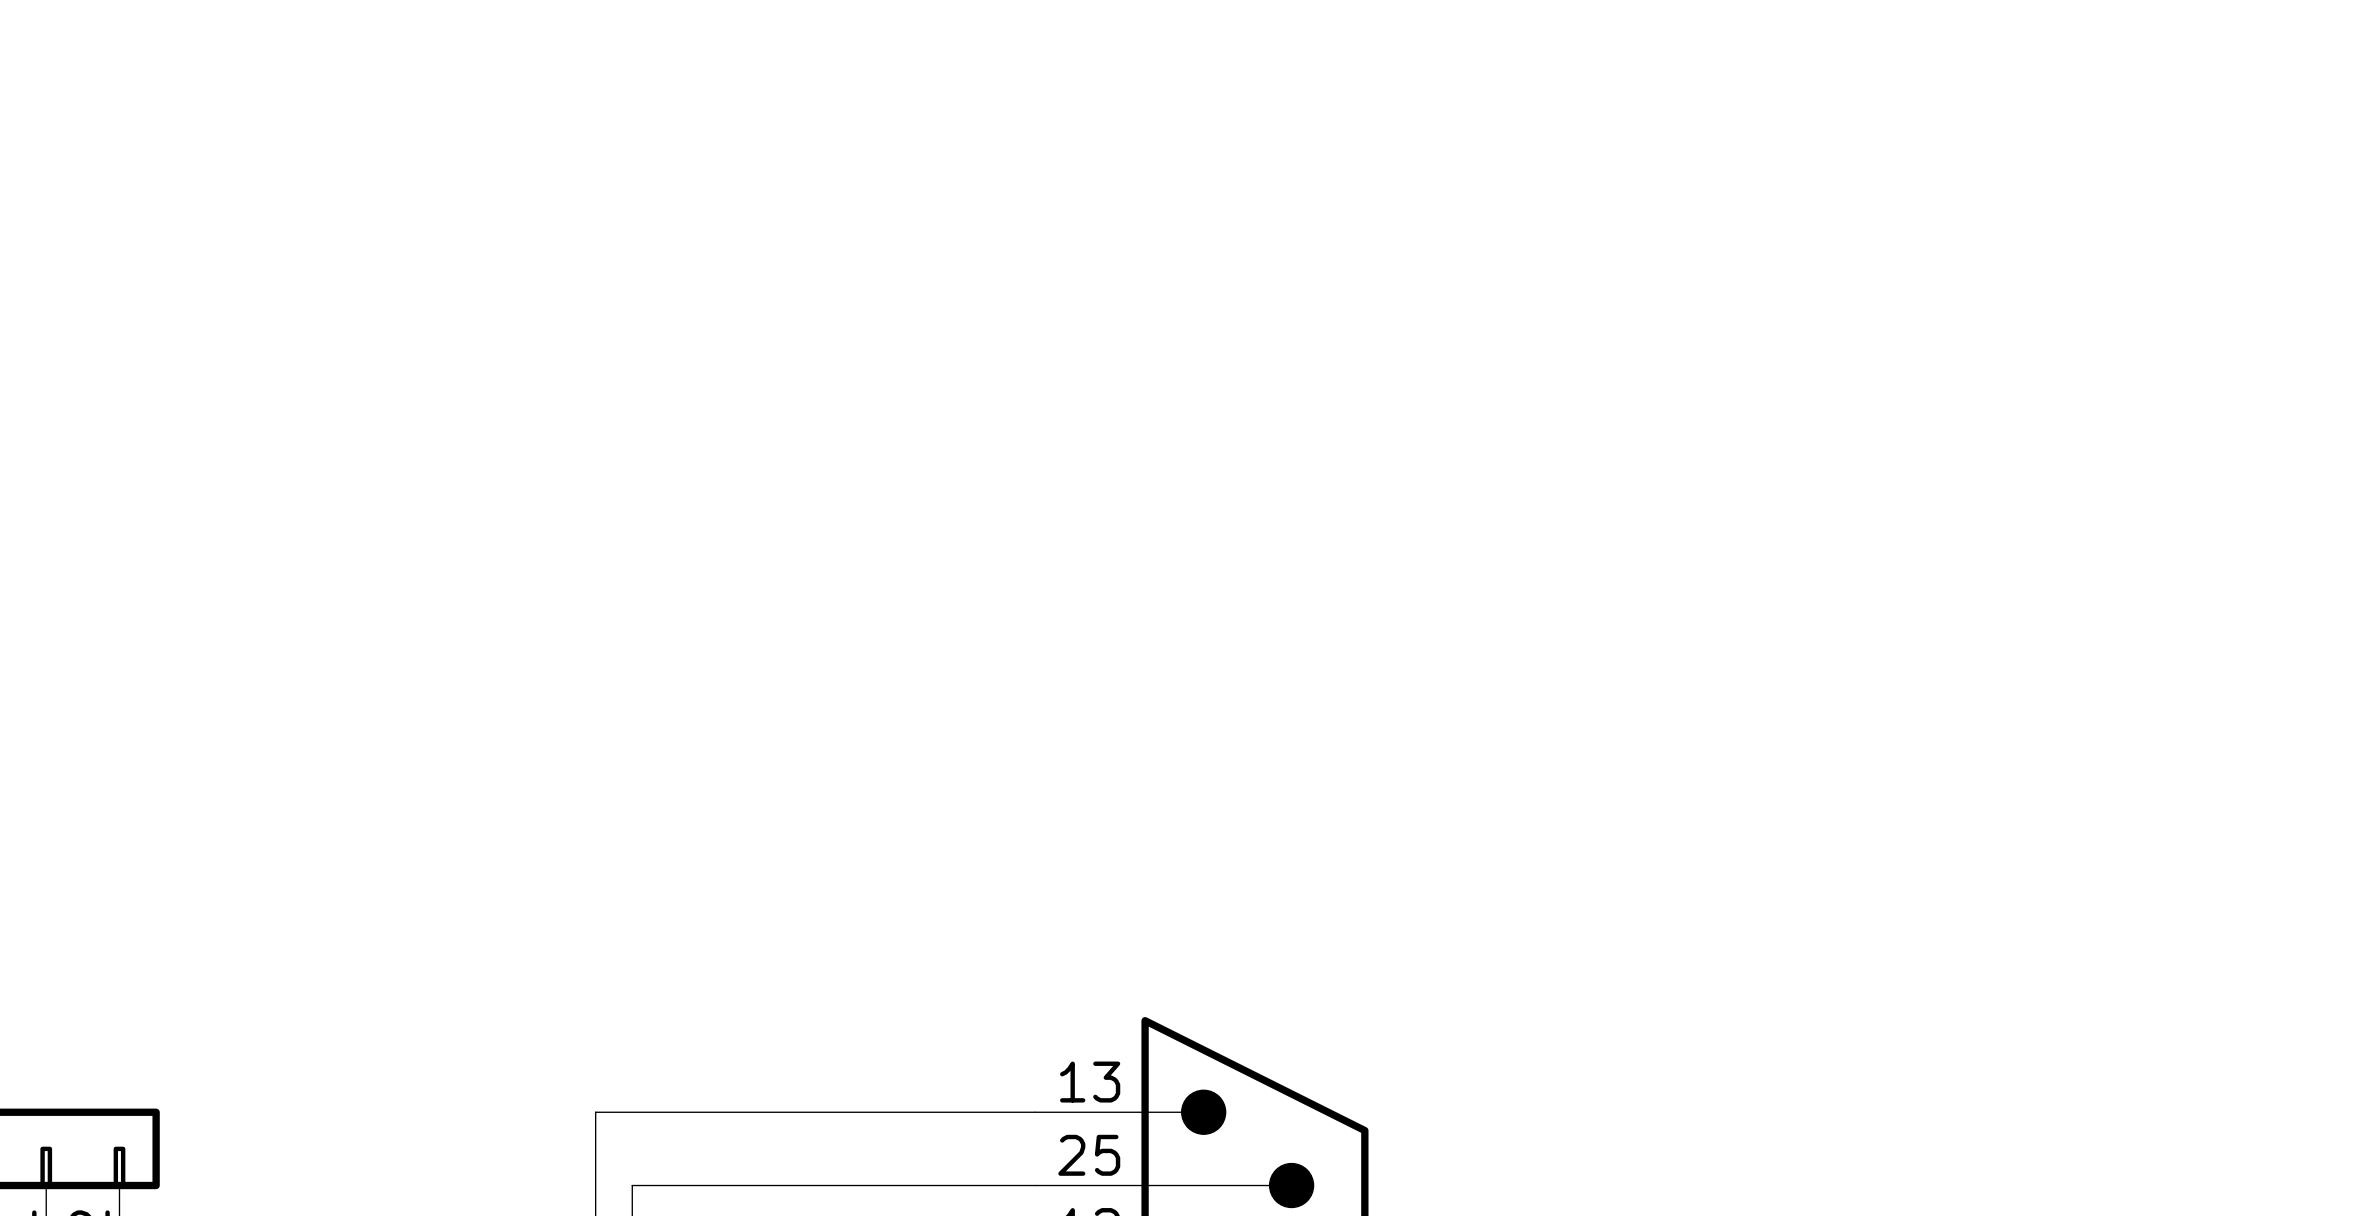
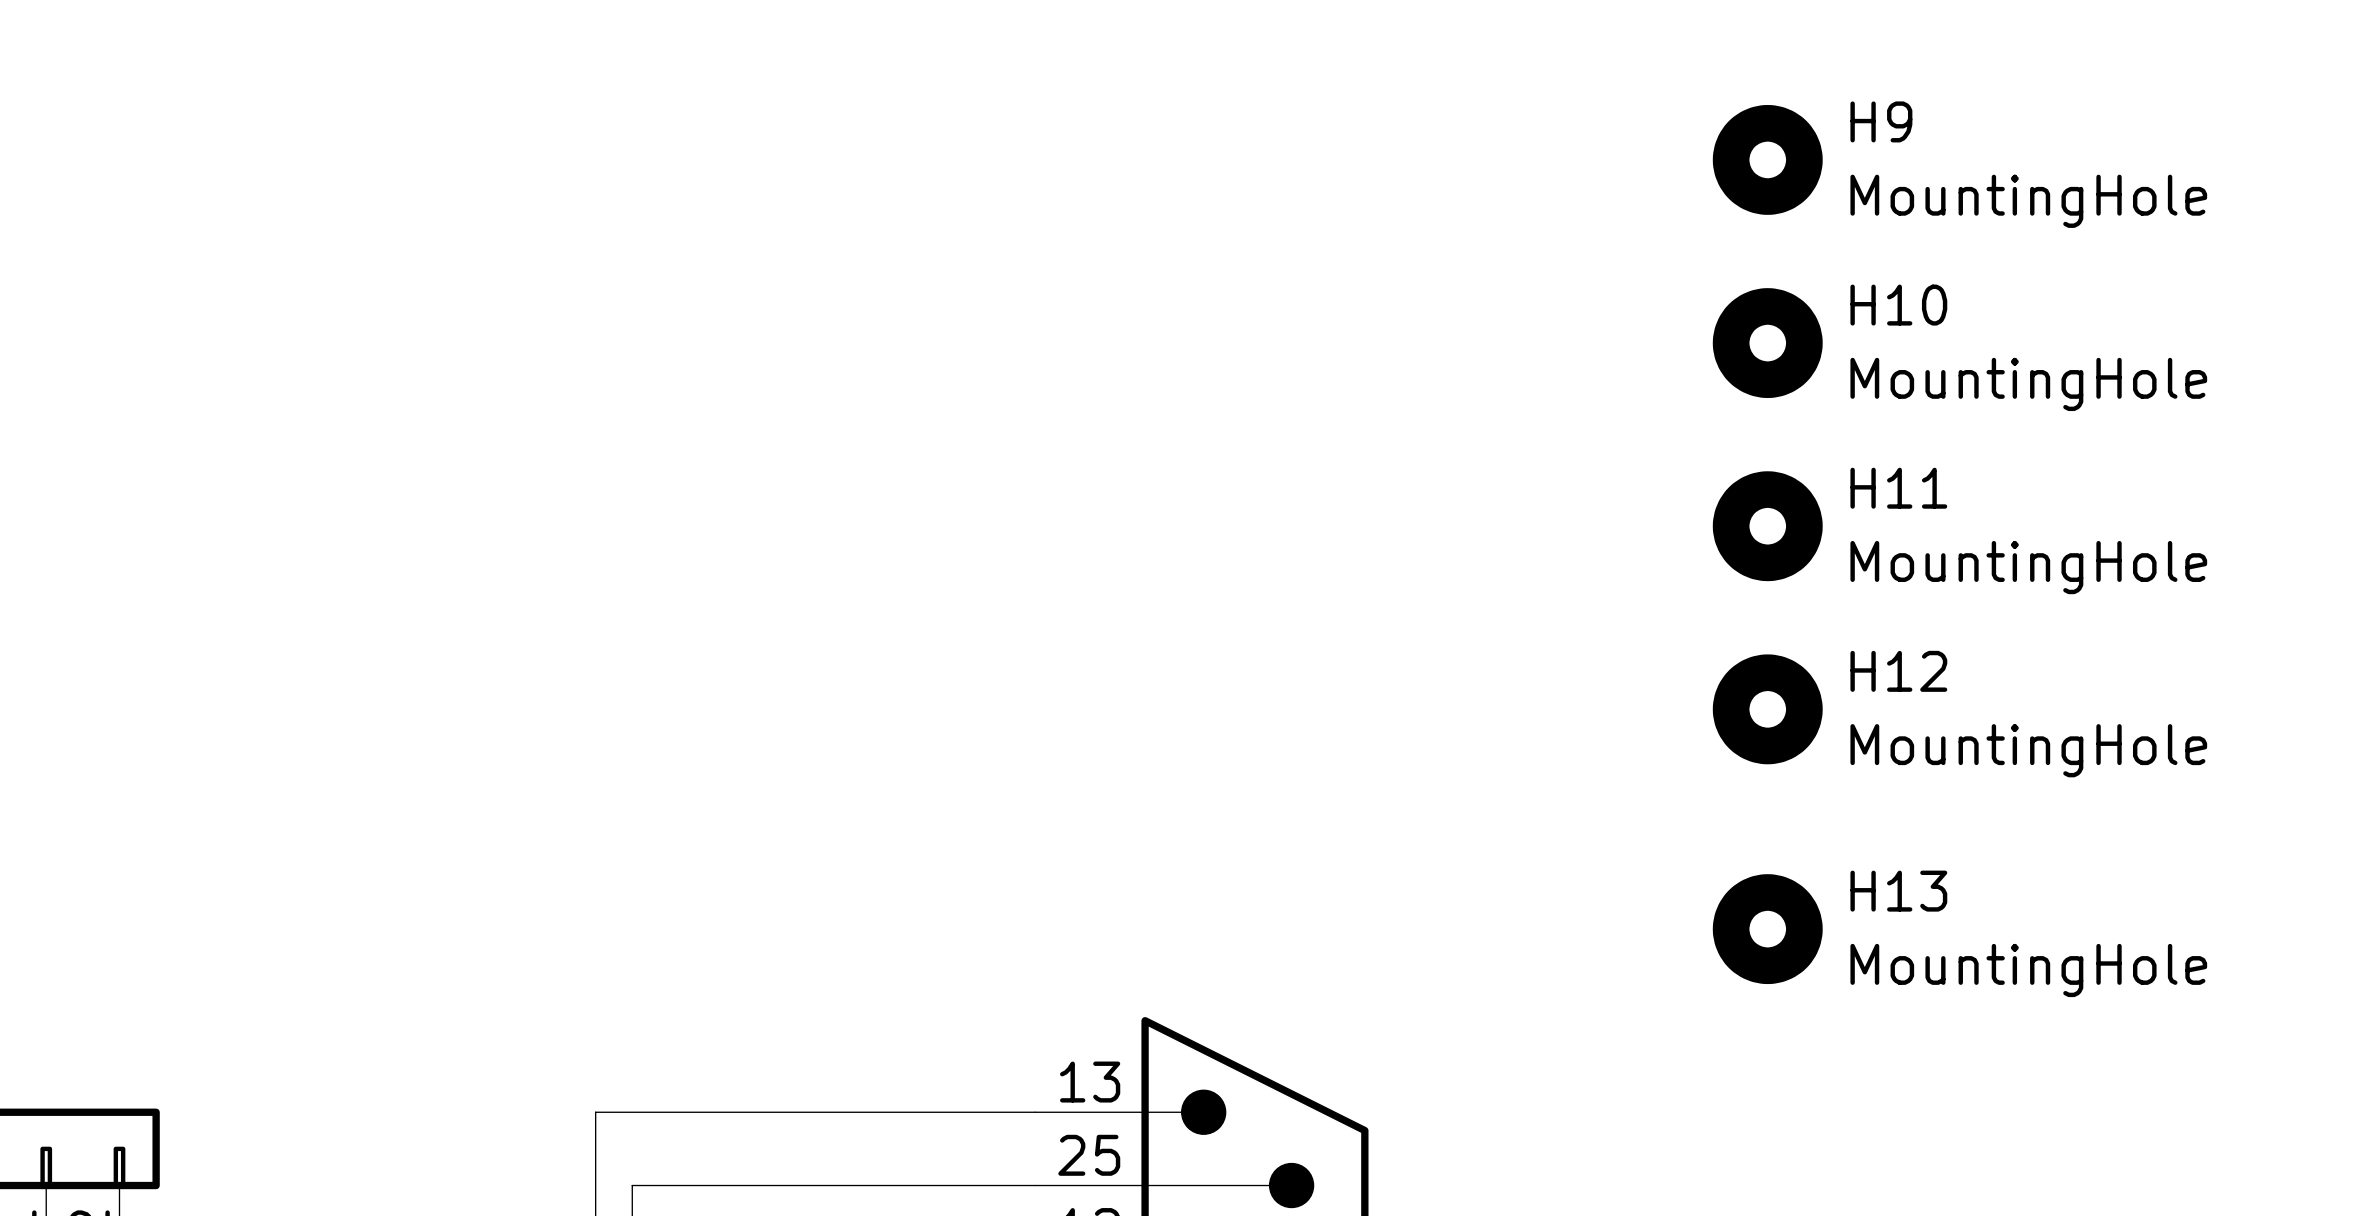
H9: none -> MountingHole (1767, 159)
H10: none -> MountingHole (1767, 343)
H11: none -> MountingHole (1767, 526)
H12: none -> MountingHole (1767, 709)
H13: none -> MountingHole (1767, 929)

